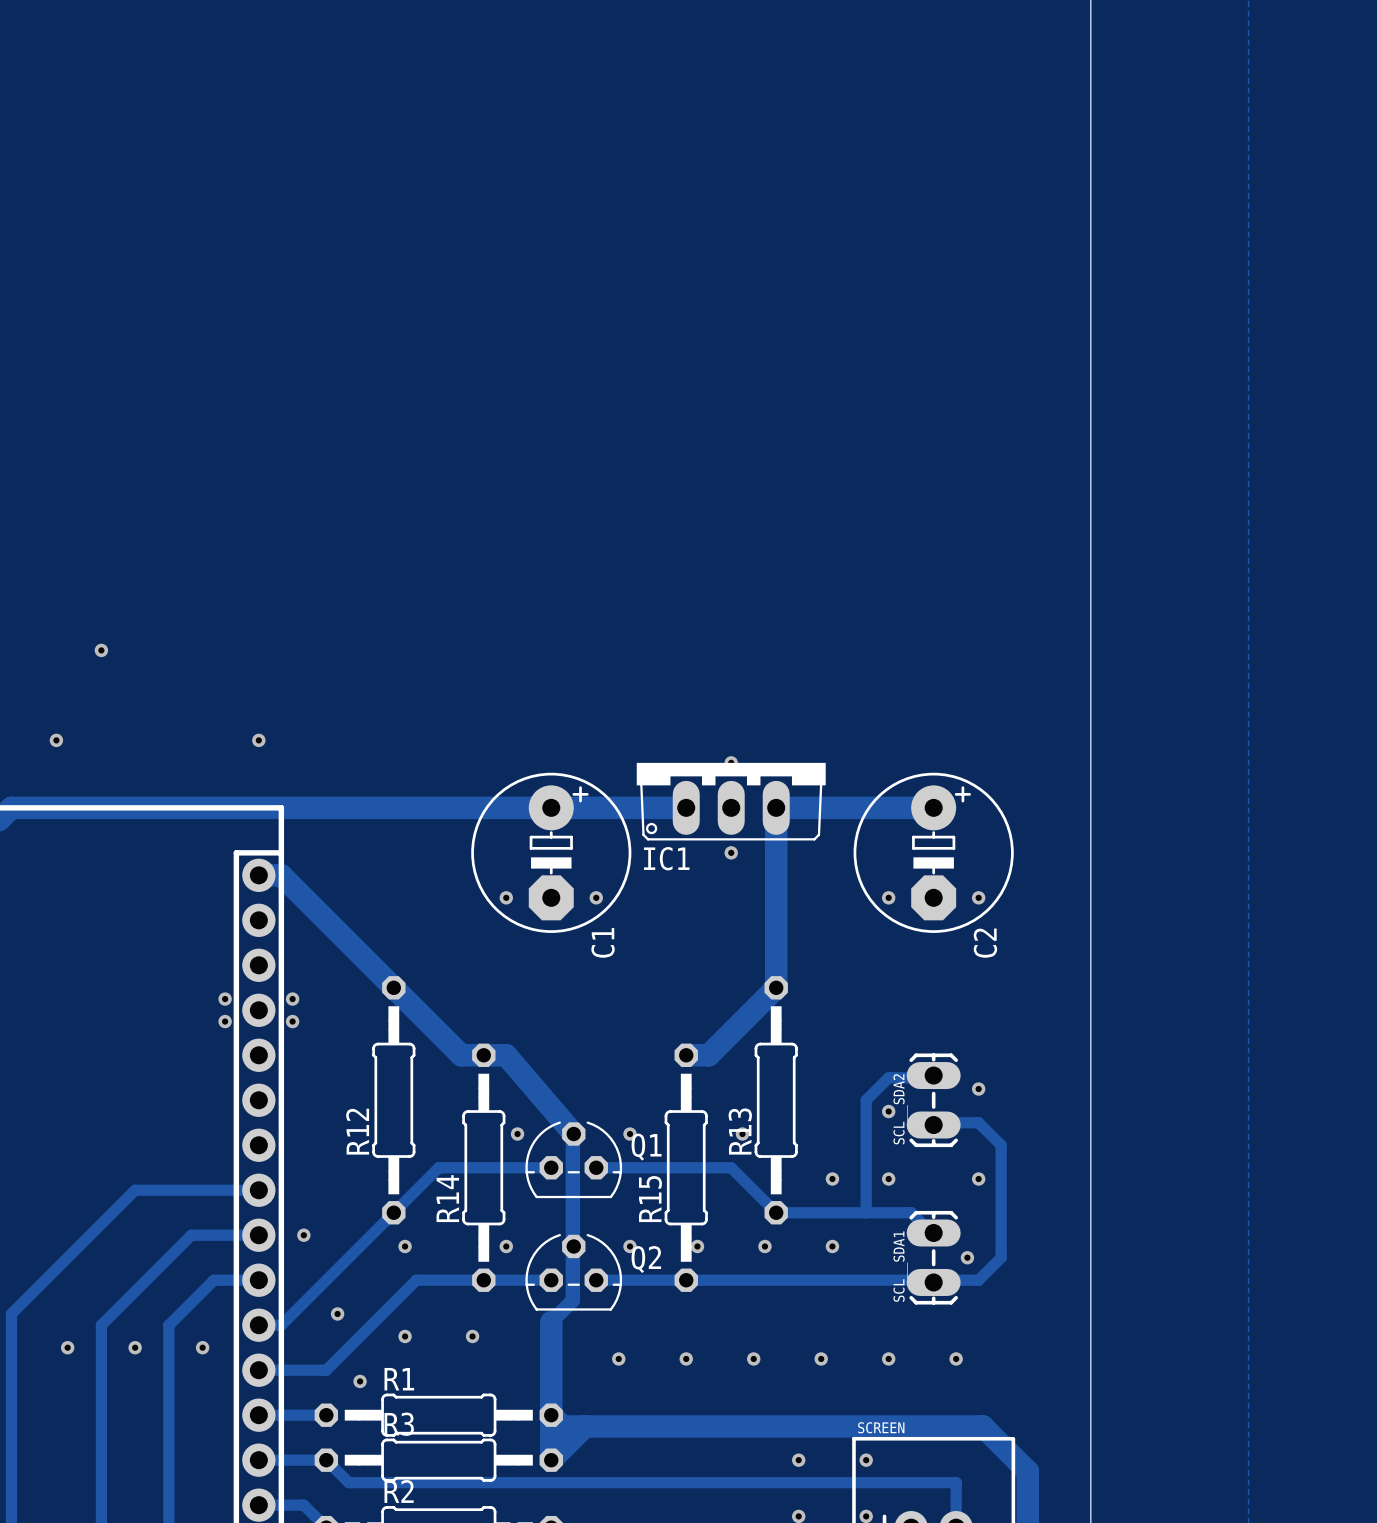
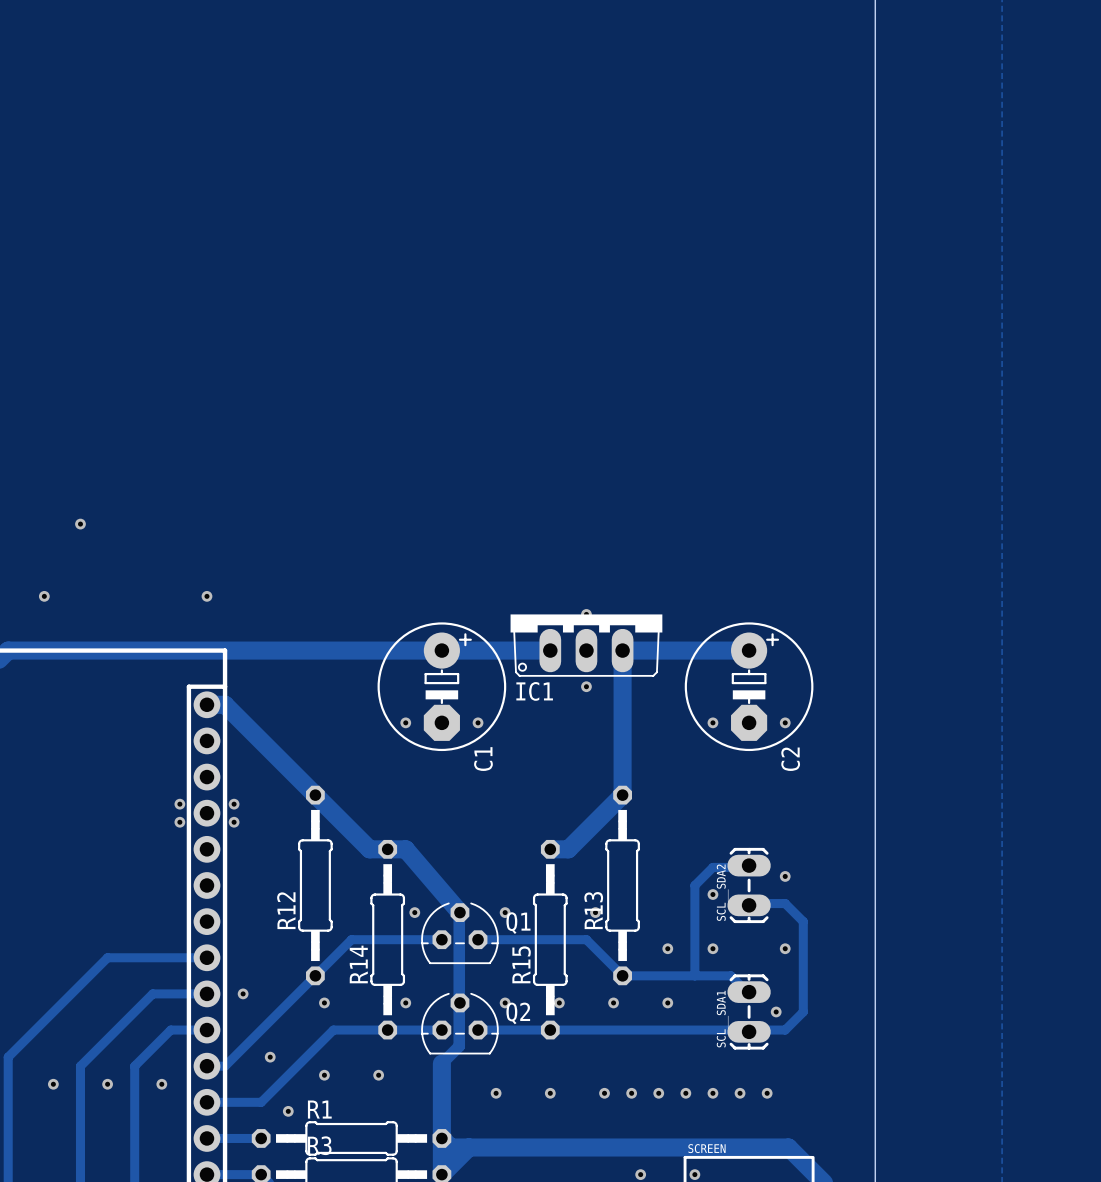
via: none -> (631, 1093)
via: none -> (685, 1093)
via: none -> (740, 1093)

